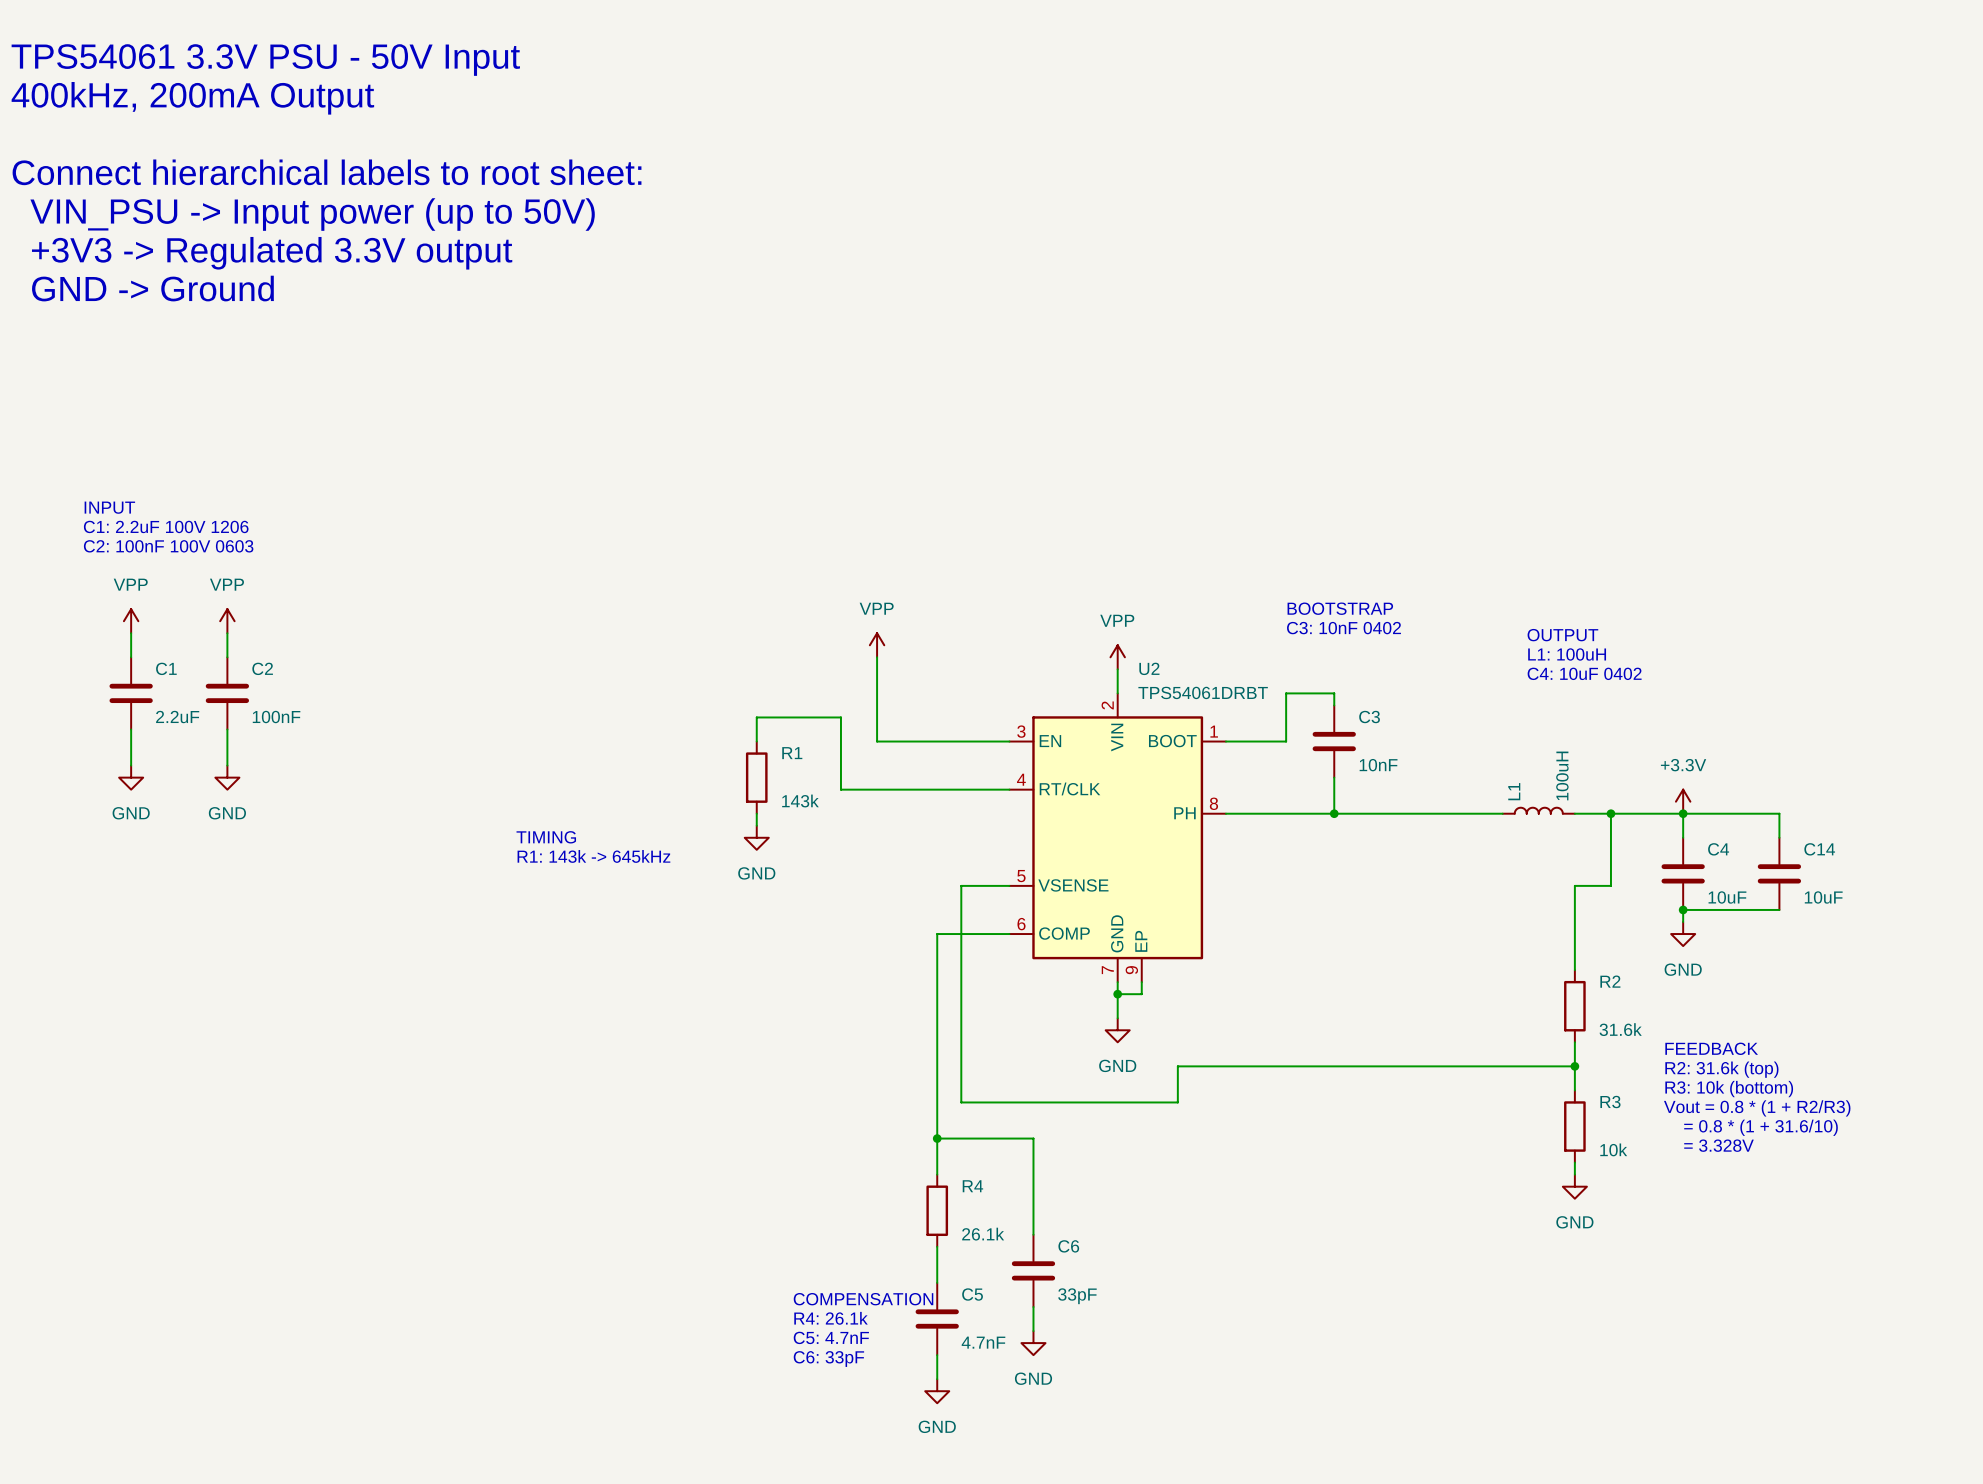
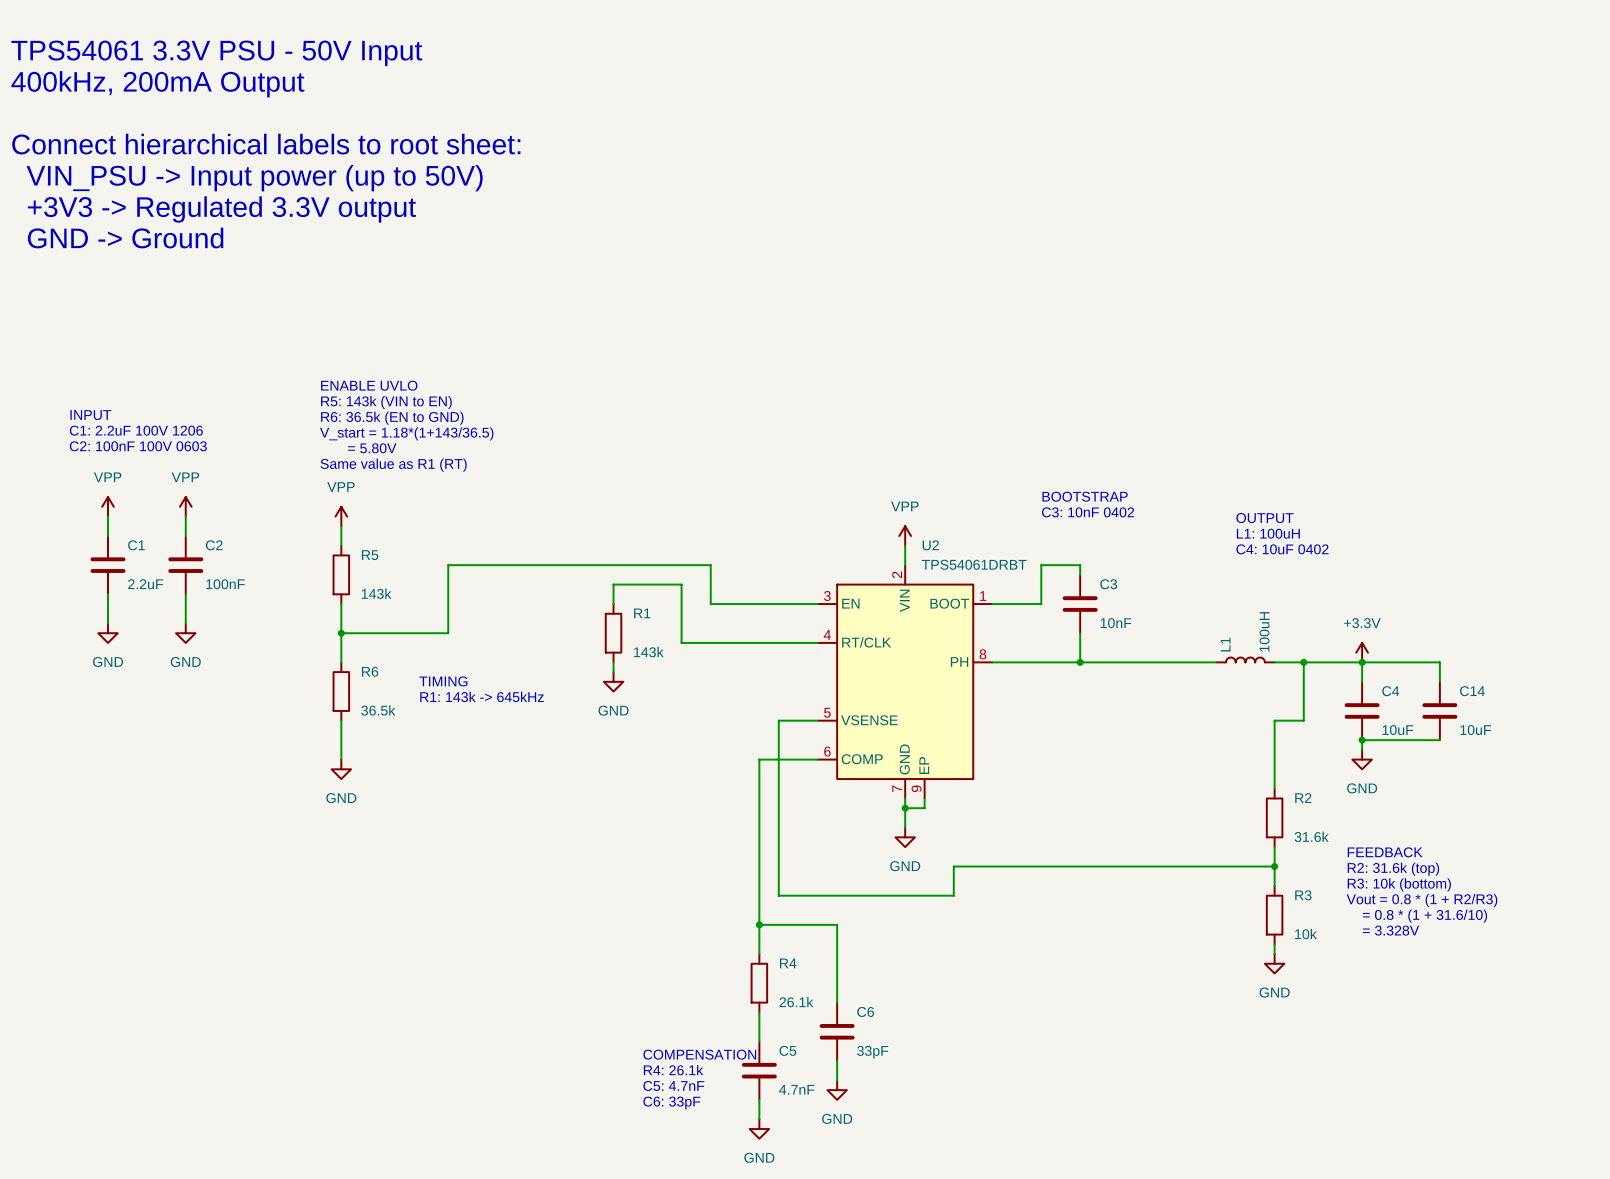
text: none -> ENABLE UVLO (369, 385)
text: none -> R5: 143k (VIN to EN) (386, 402)
text: none -> R6: 36.5k (EN to GND) (392, 418)
text: none -> V_start = 1.18*(1+143/36.5) (406, 433)
text: none -> = 5.80V (372, 448)
text: none -> Same value as R1 (RT) (393, 465)
power symbol: none -> VPP (341, 516)
wire: none -> (341, 526) (341, 545)
power symbol: VPP (877, 645) -> none
wire: (877, 657) (877, 693) -> (341, 633) (448, 633) (448, 565) (710, 565)
R5: none -> 143k (341, 574)
wire: none -> (341, 604) (341, 662)
junction: none -> (341, 633)
R6: none -> 36.5k (341, 691)
wire: none -> (341, 720) (341, 759)
power symbol: none -> GND (341, 769)

